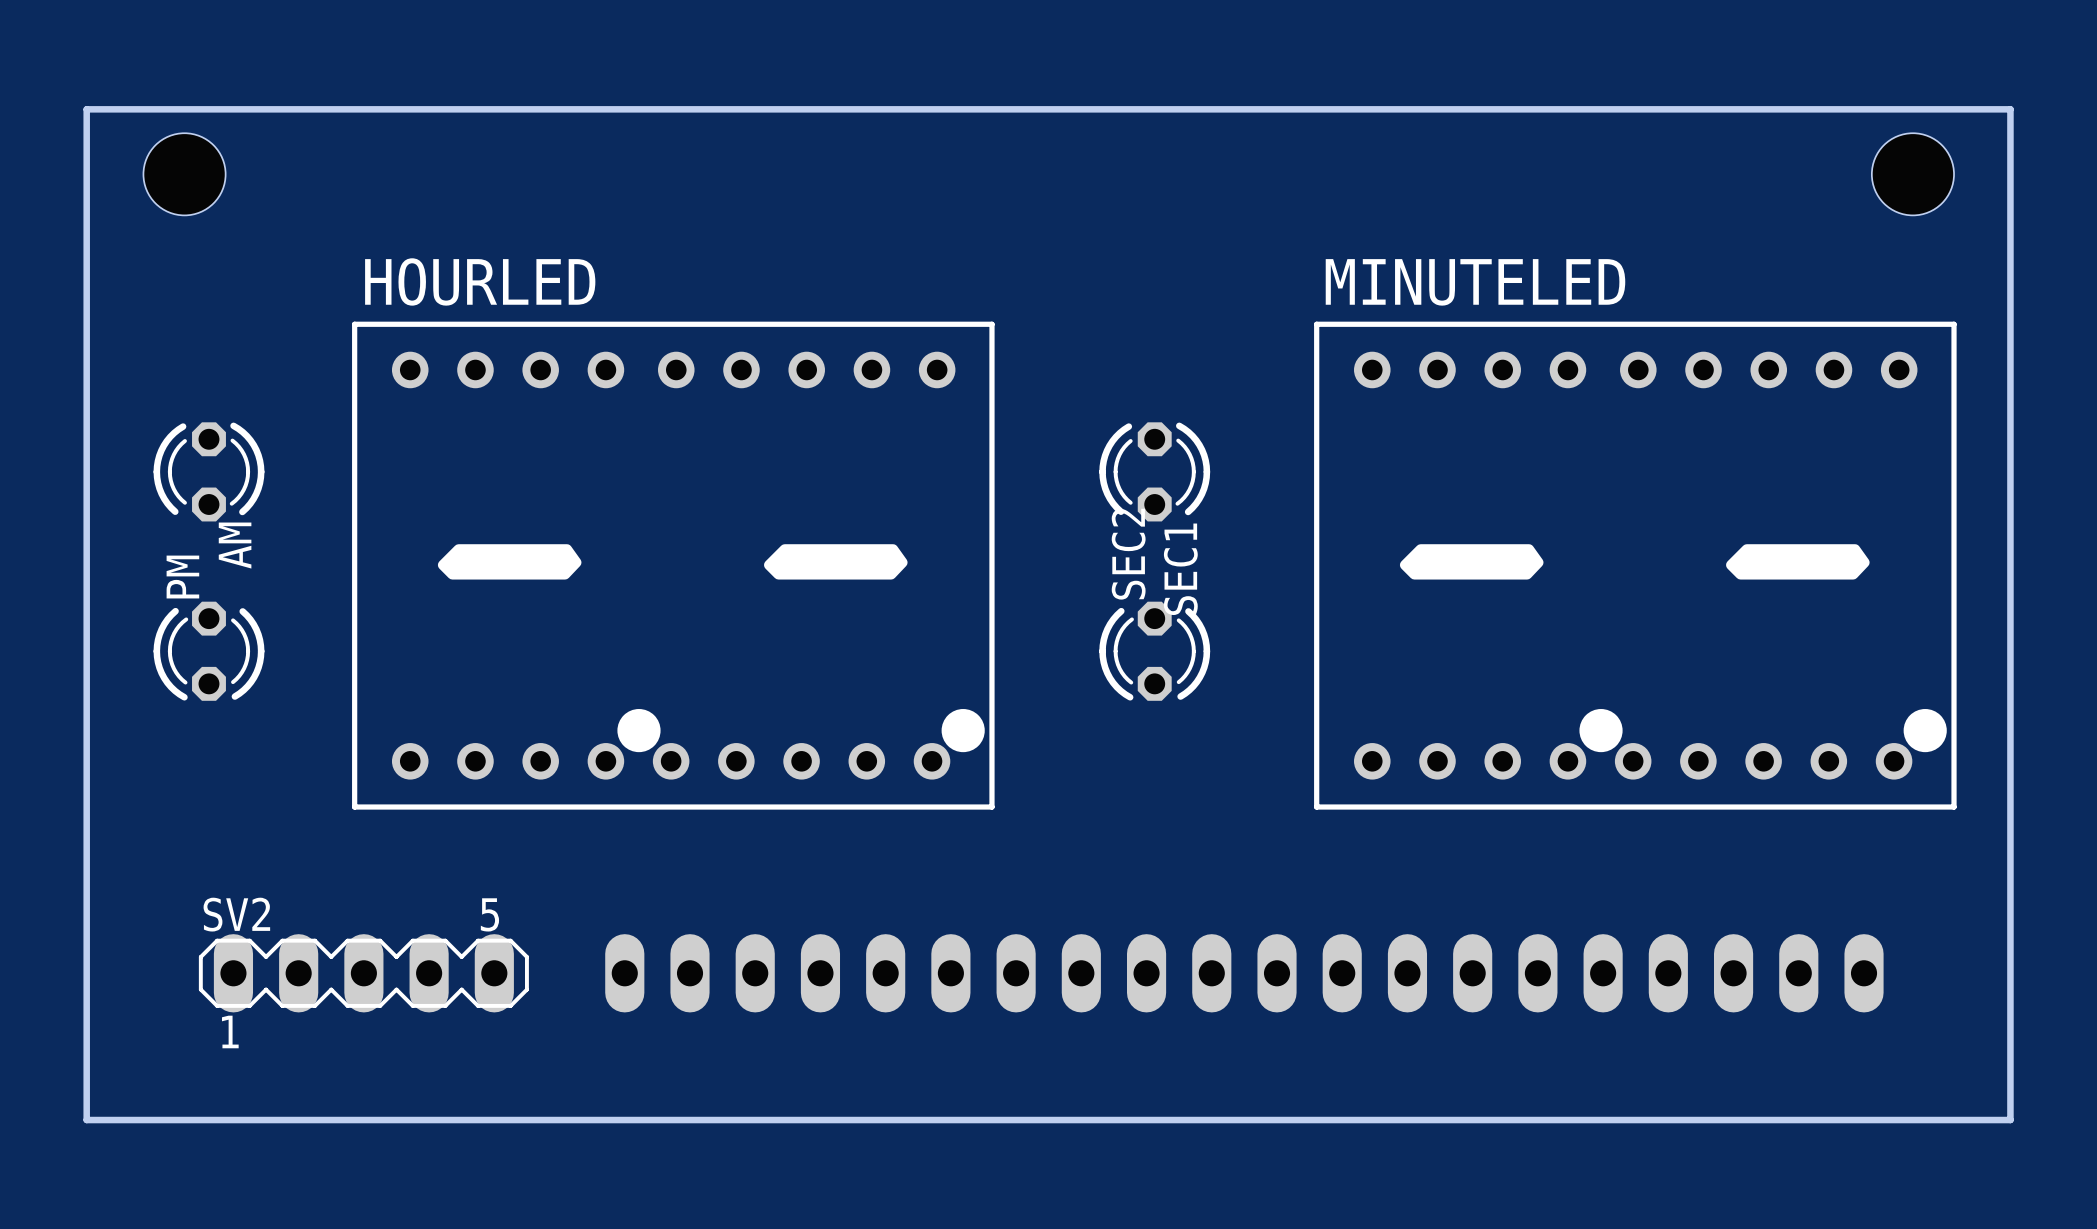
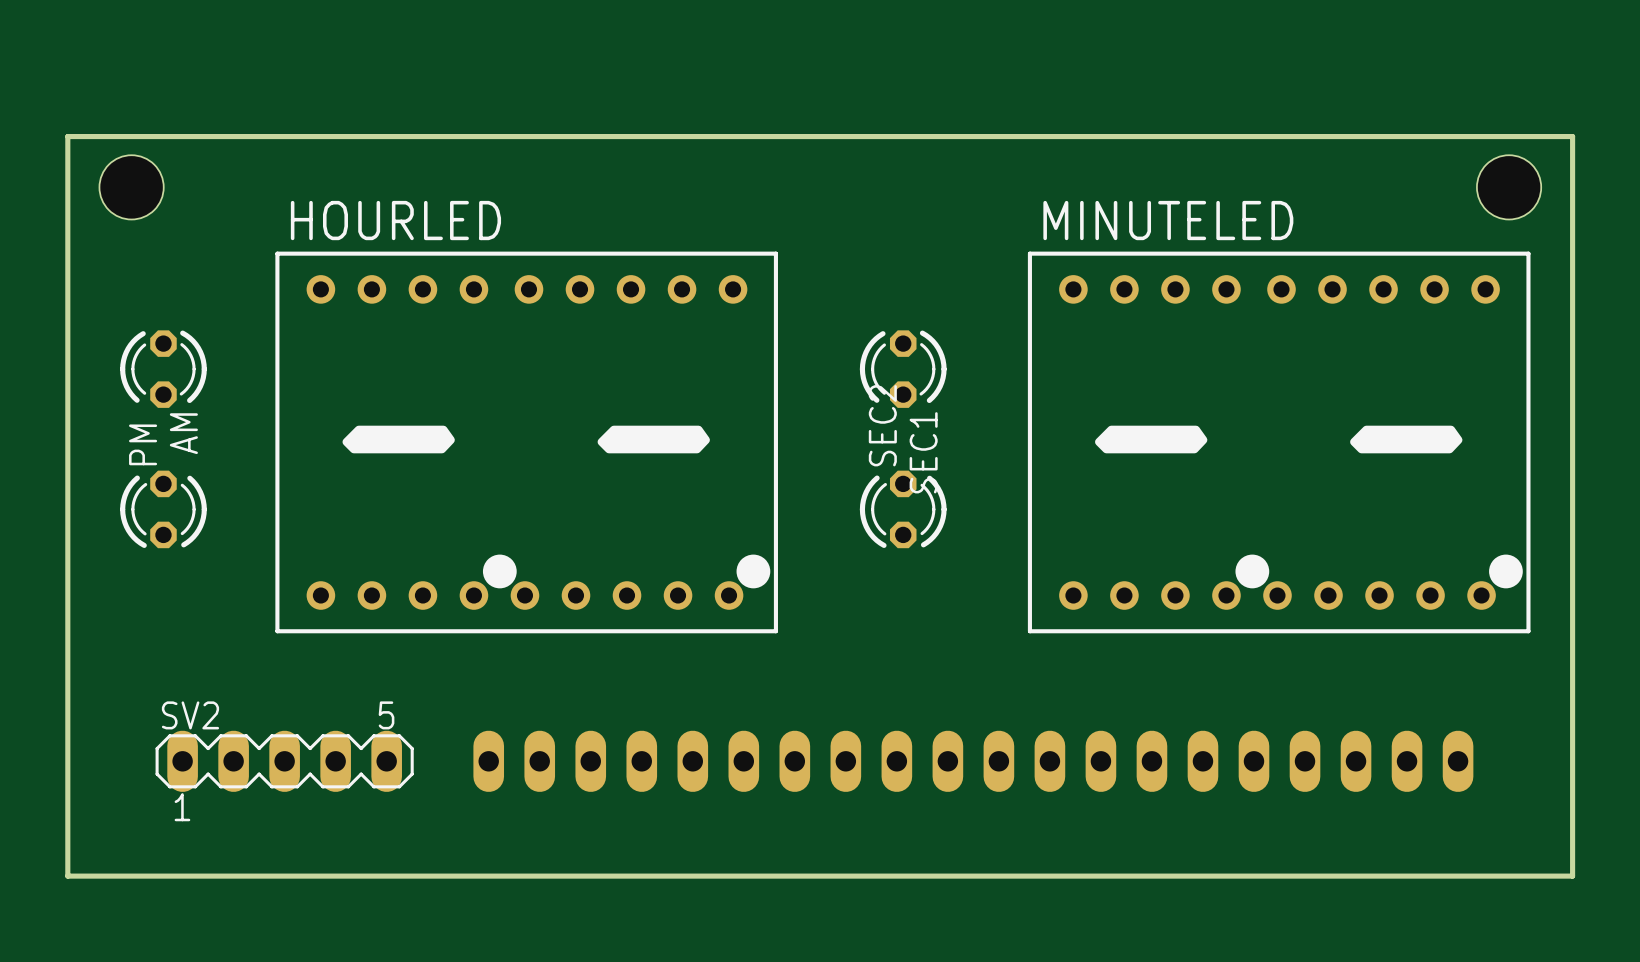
board edge: (86, 174) (86, 109) (2010, 109) (2010, 174) -> (67, 136) (1572, 136)
hole position: (184, 174) -> (131, 187)
hole position: (1912, 174) -> (1509, 187)

